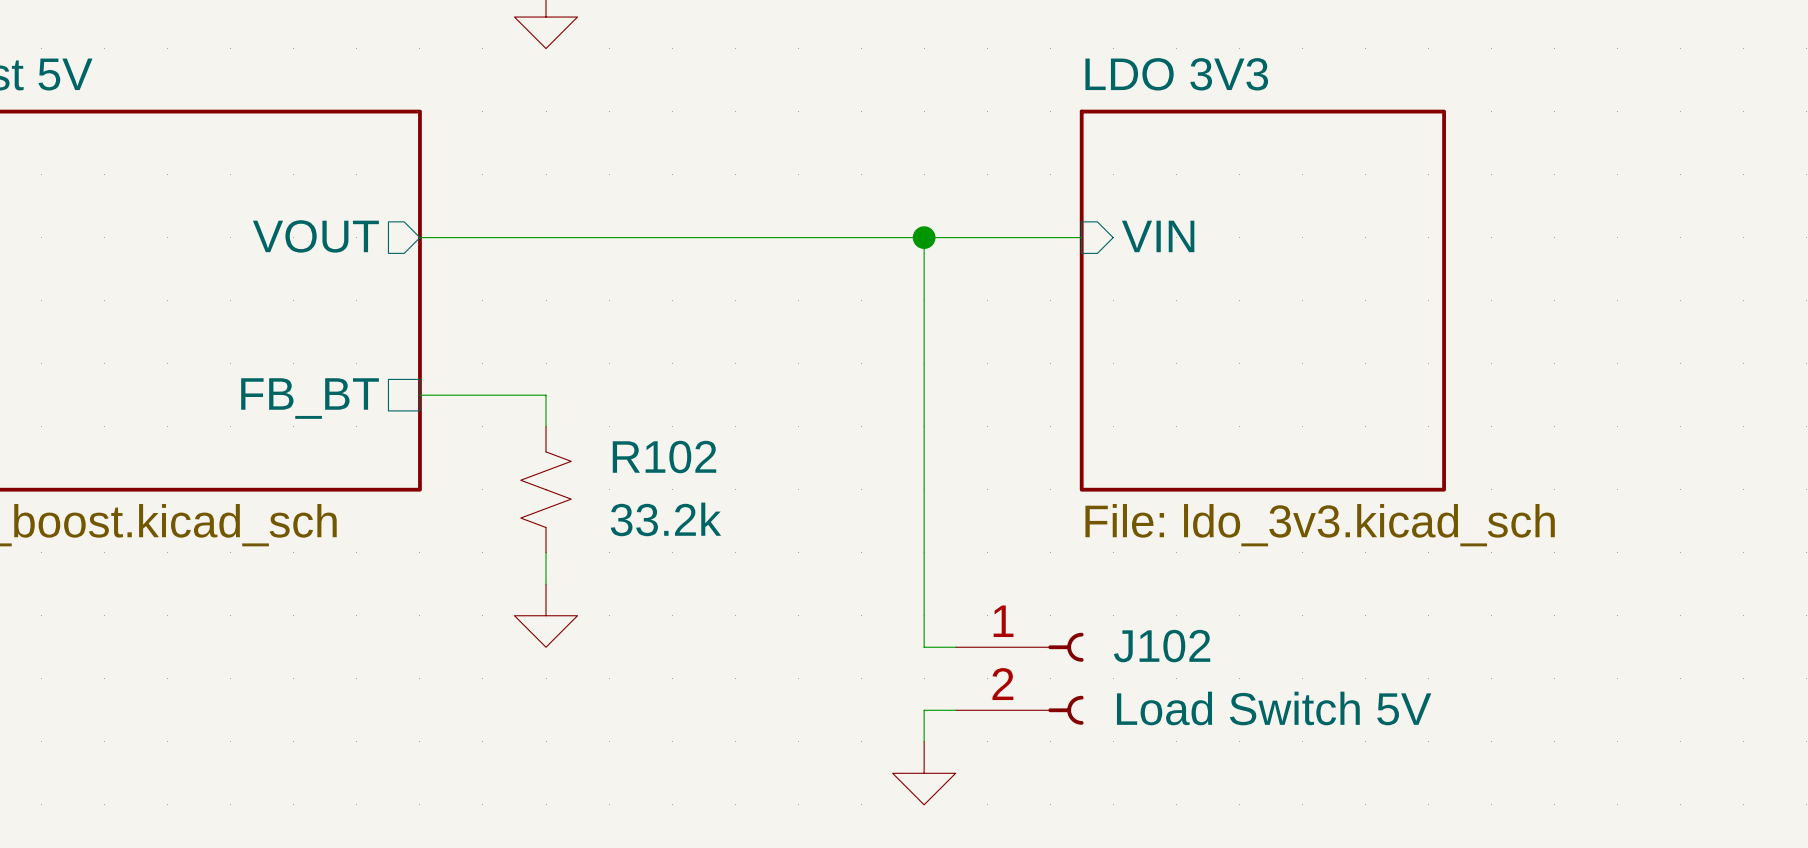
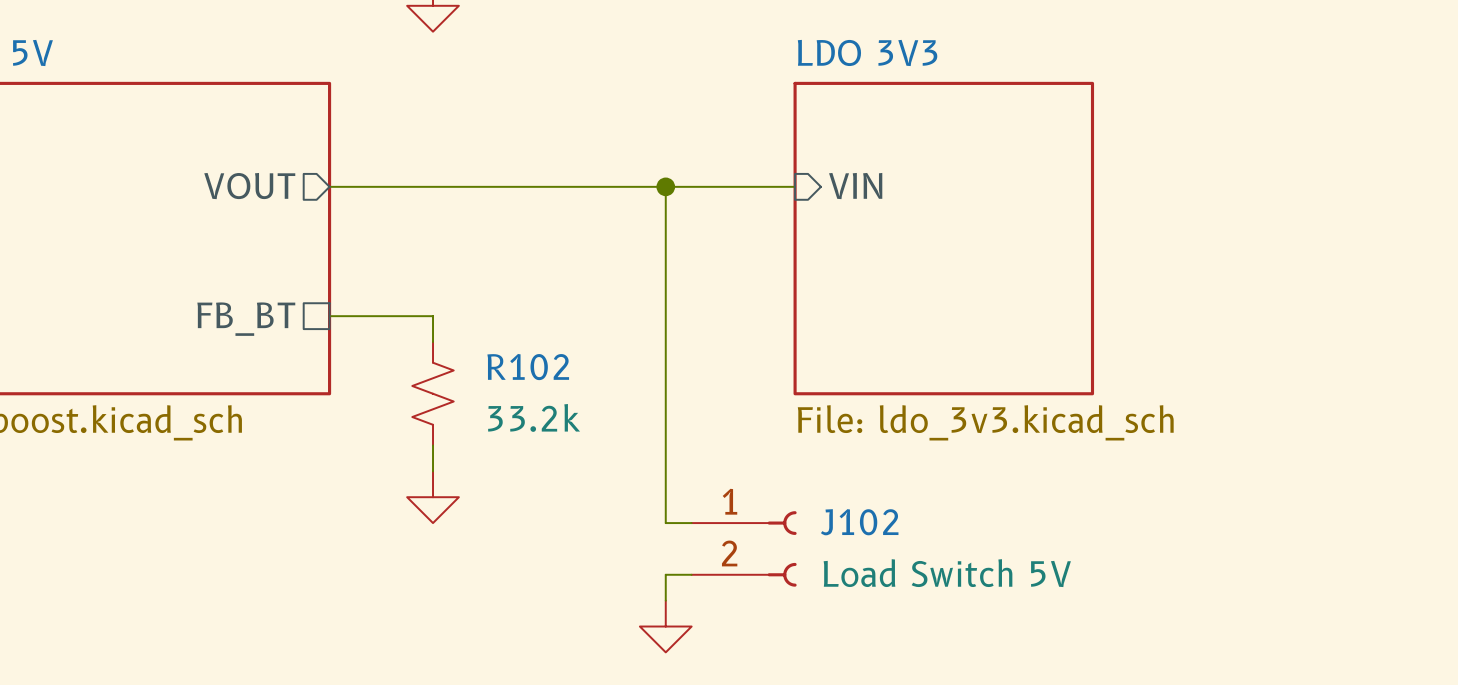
sheet pin position: VIN (1158, 236) -> VIN (855, 186)
wire: (924, 237) (924, 647) (955, 647) -> (665, 186) (665, 523) (691, 523)
junction position: (924, 237) -> (665, 186)
wire: (987, 237) (1081, 237) -> none
sheet LDO 3V3 position: (1262, 300) -> (943, 238)
J102 position: (1019, 678) -> (744, 548)
wire: (955, 710) (924, 710) (924, 741) -> (691, 574) (665, 574) (665, 600)
power symbol position: (924, 773) -> (665, 626)

